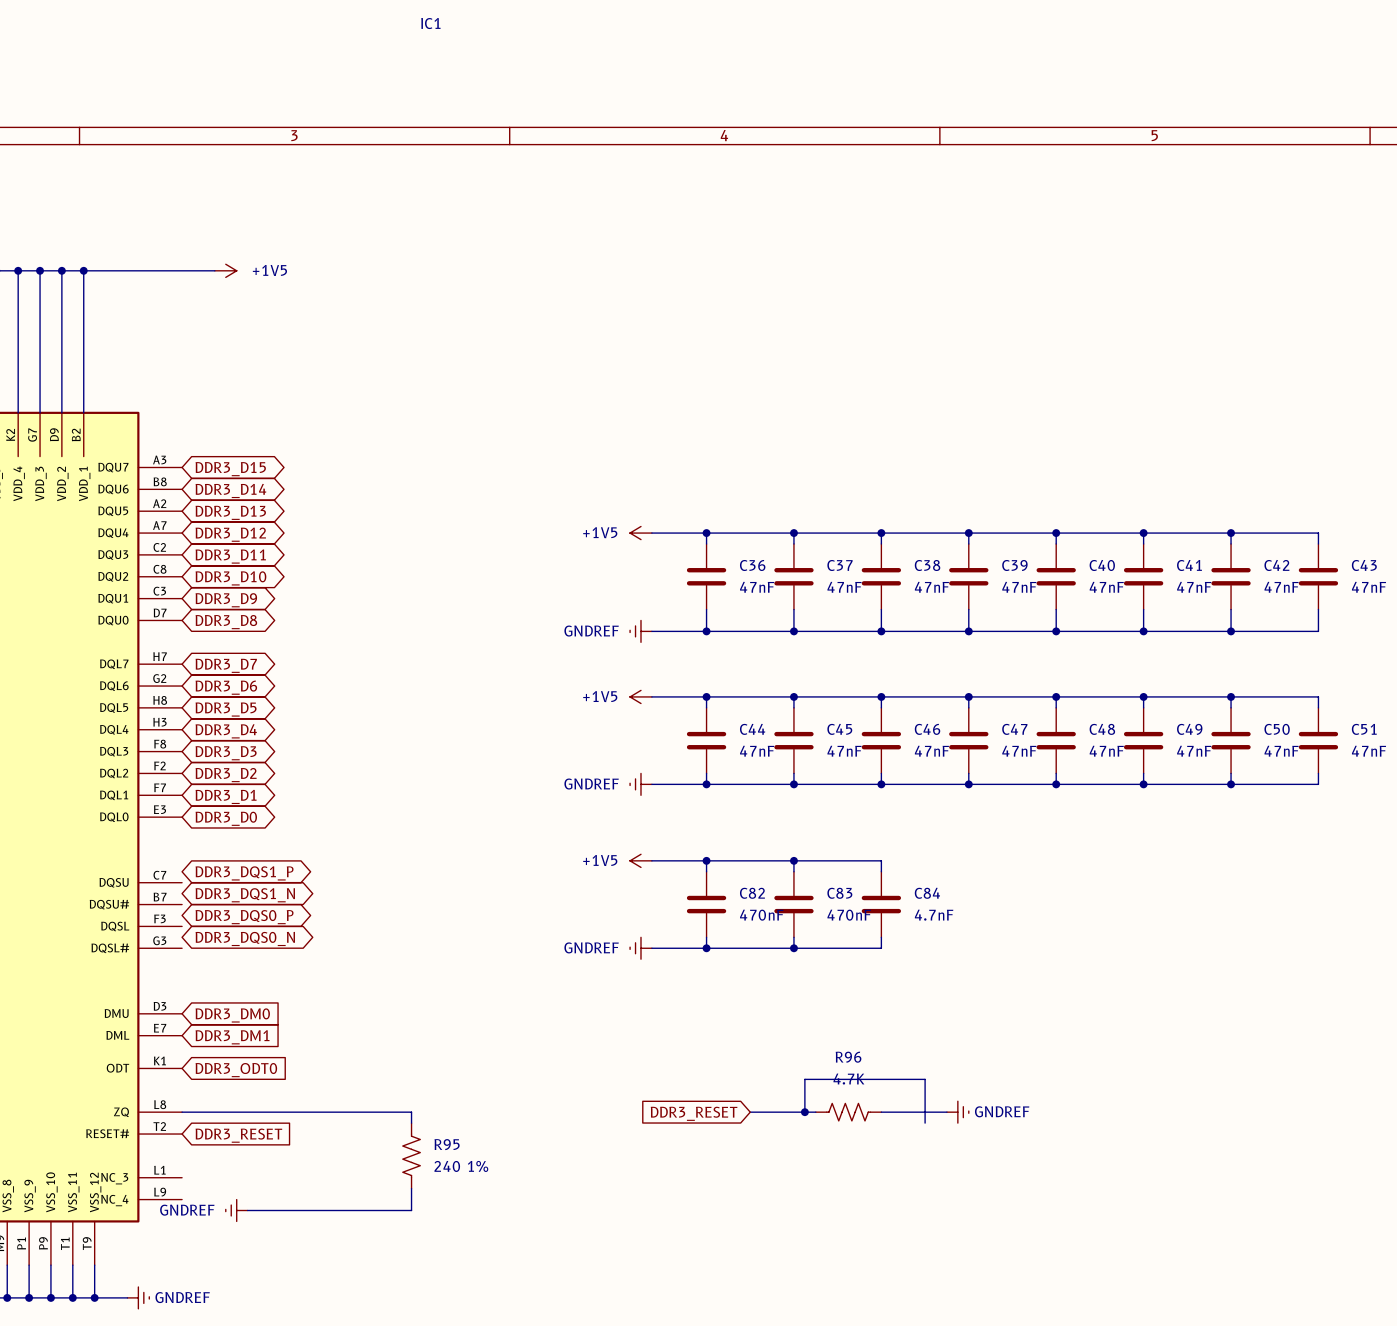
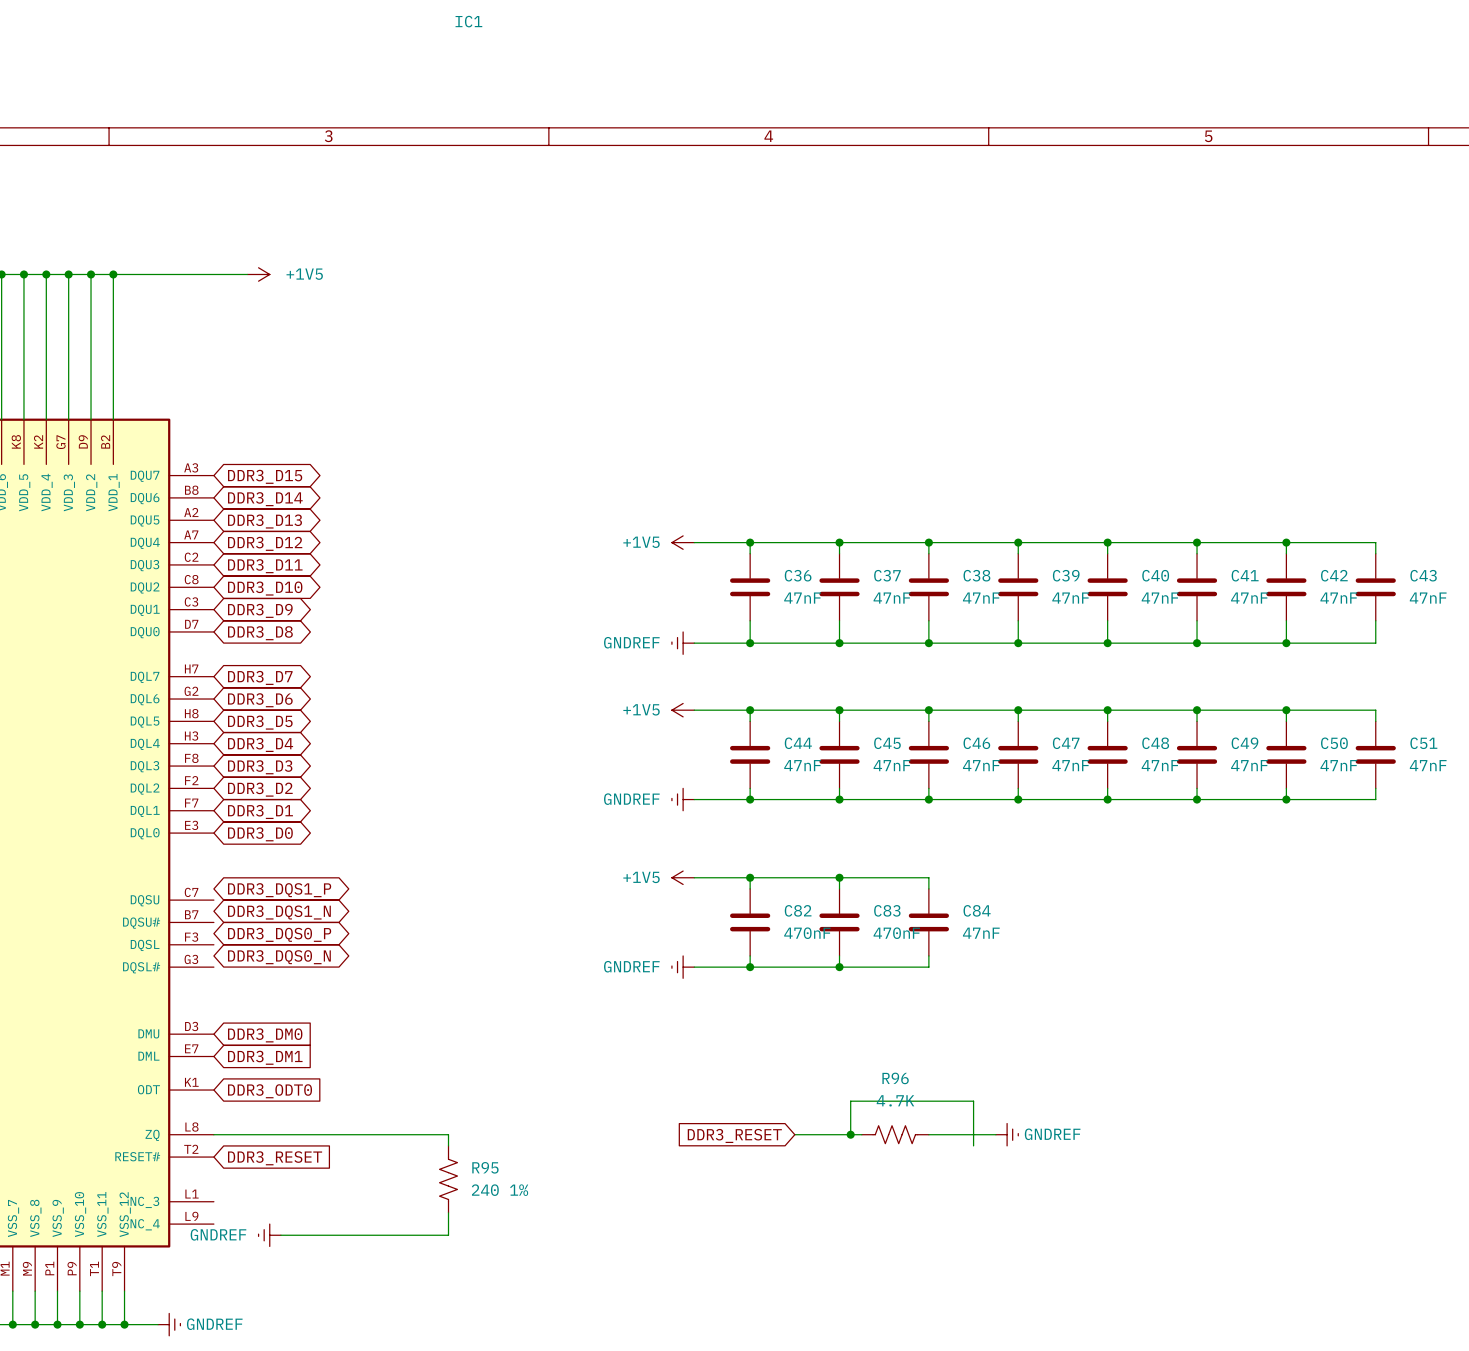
C84 value: 4.7nF (934, 915) -> 47nF (981, 933)

